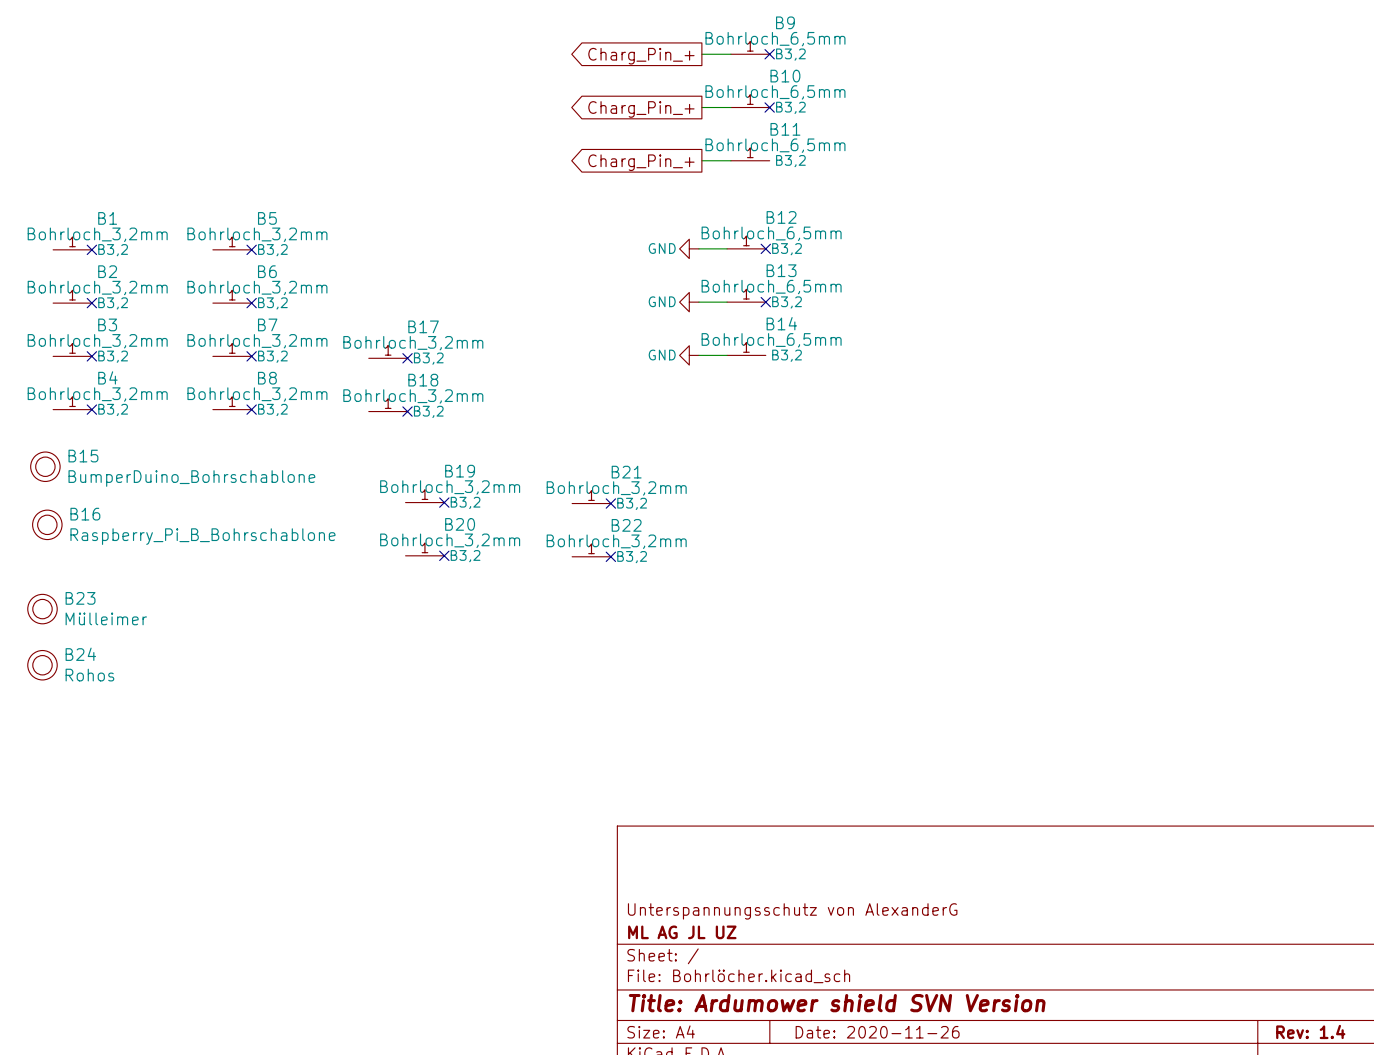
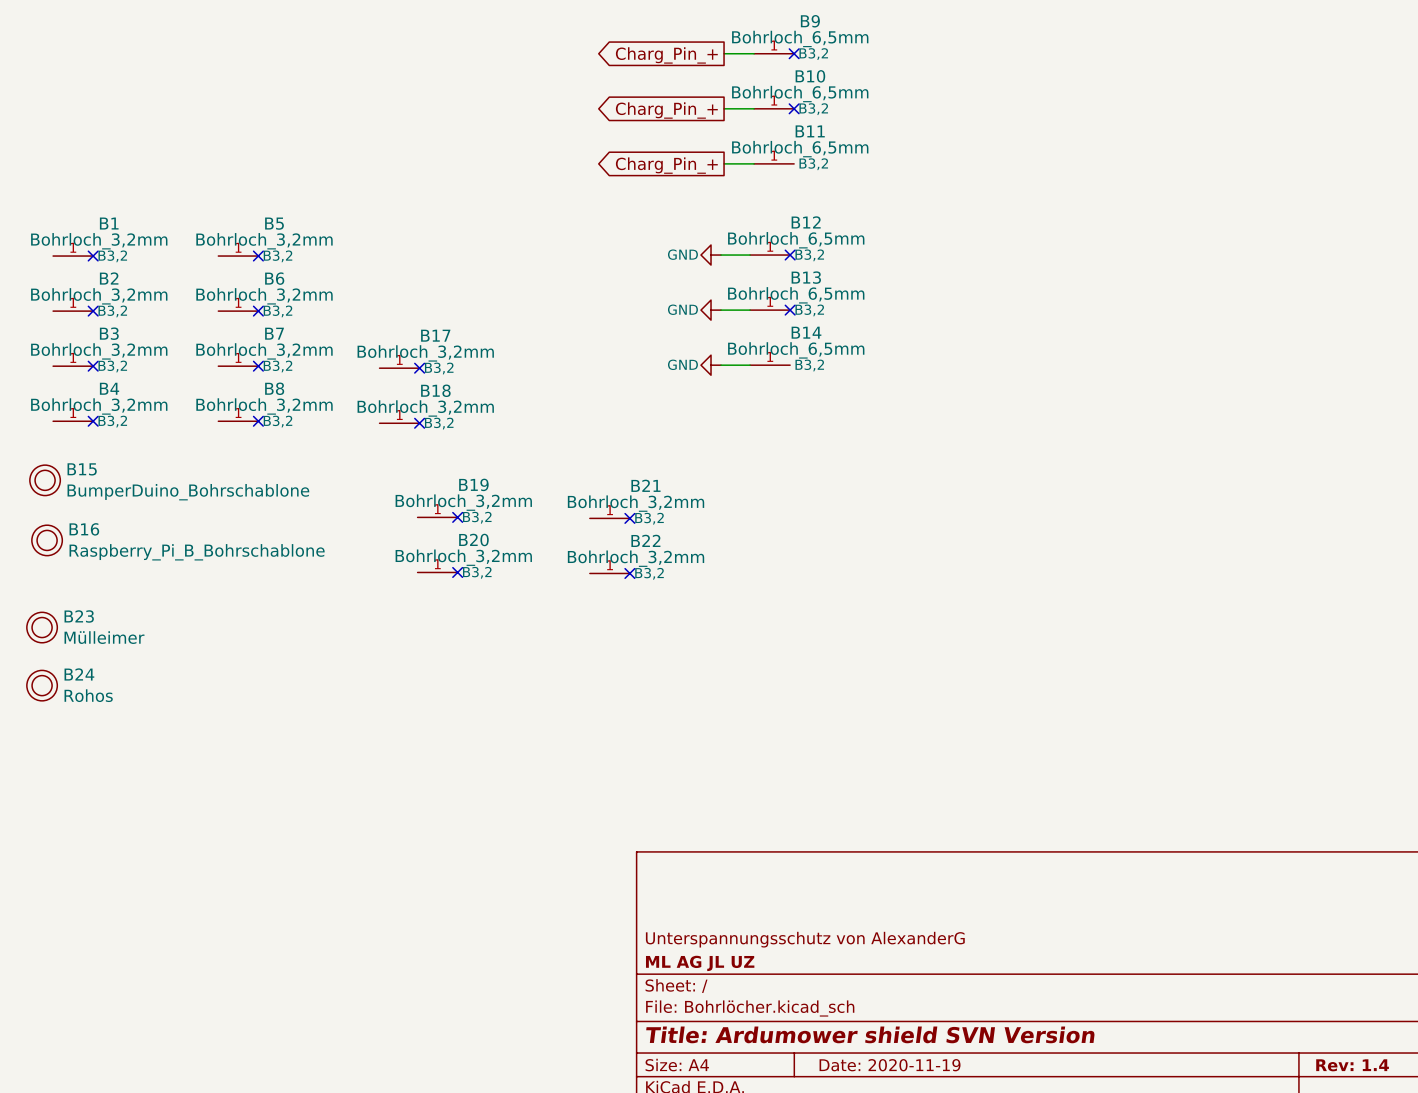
title block: Date: 2020-11-26 (877, 1032) -> Date: 2020-11-19 (890, 1065)

